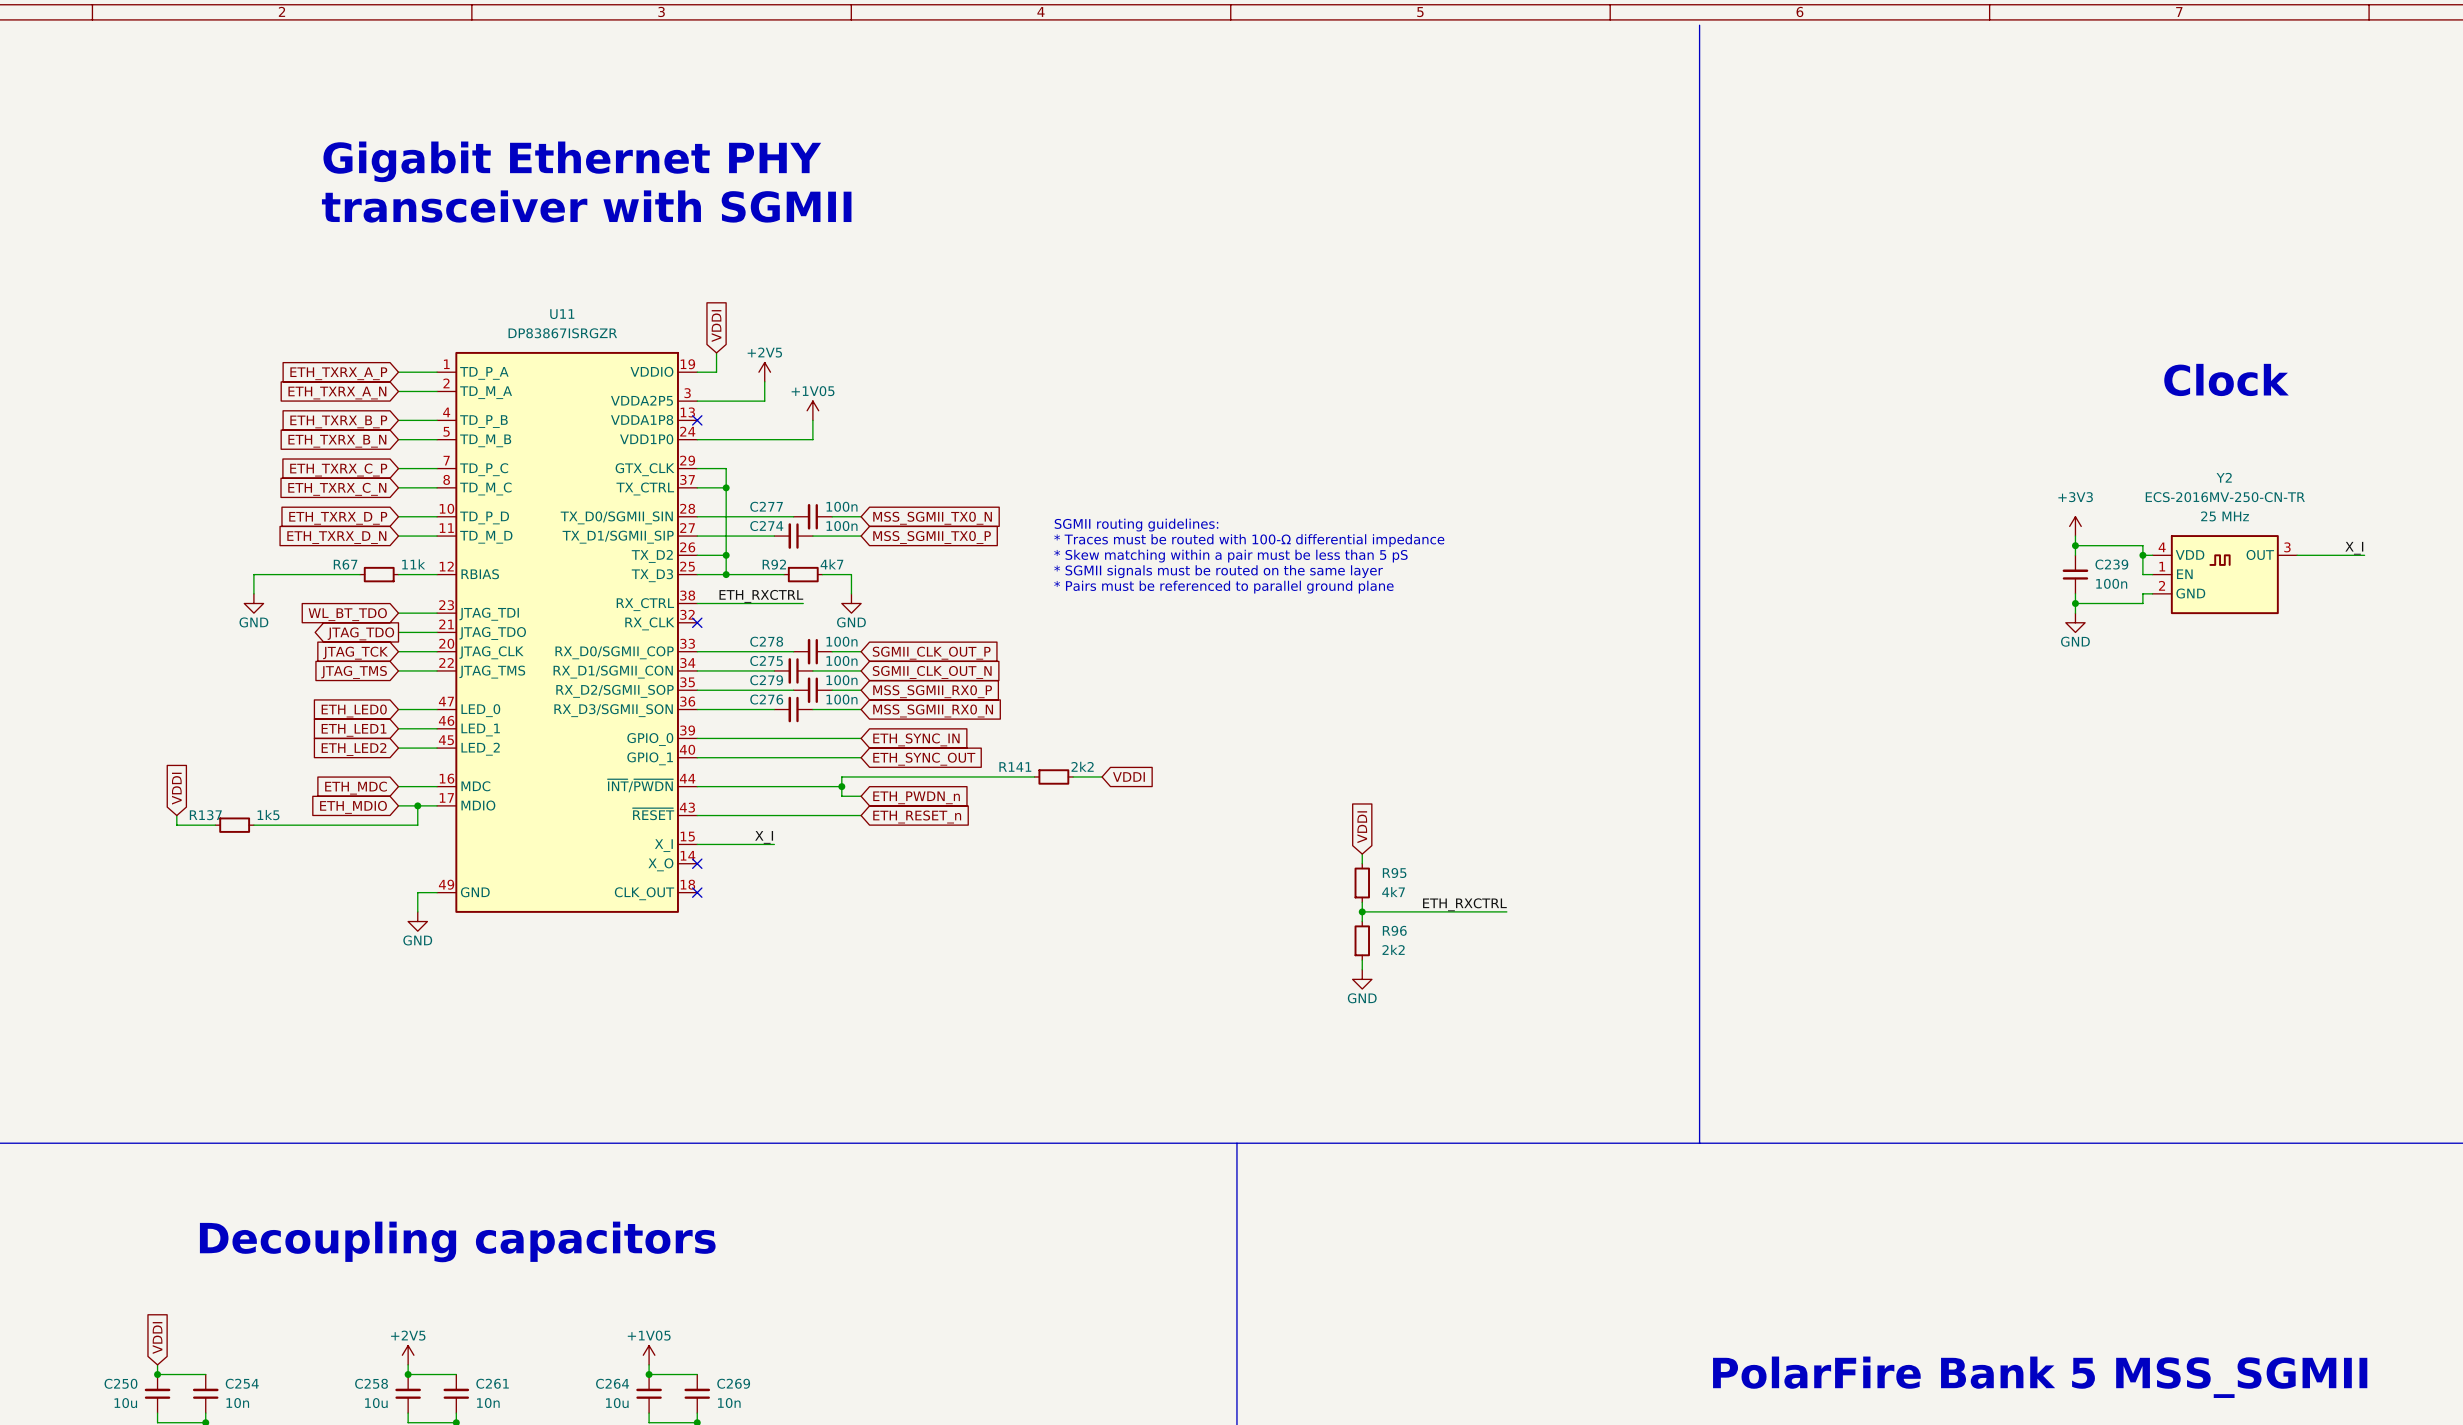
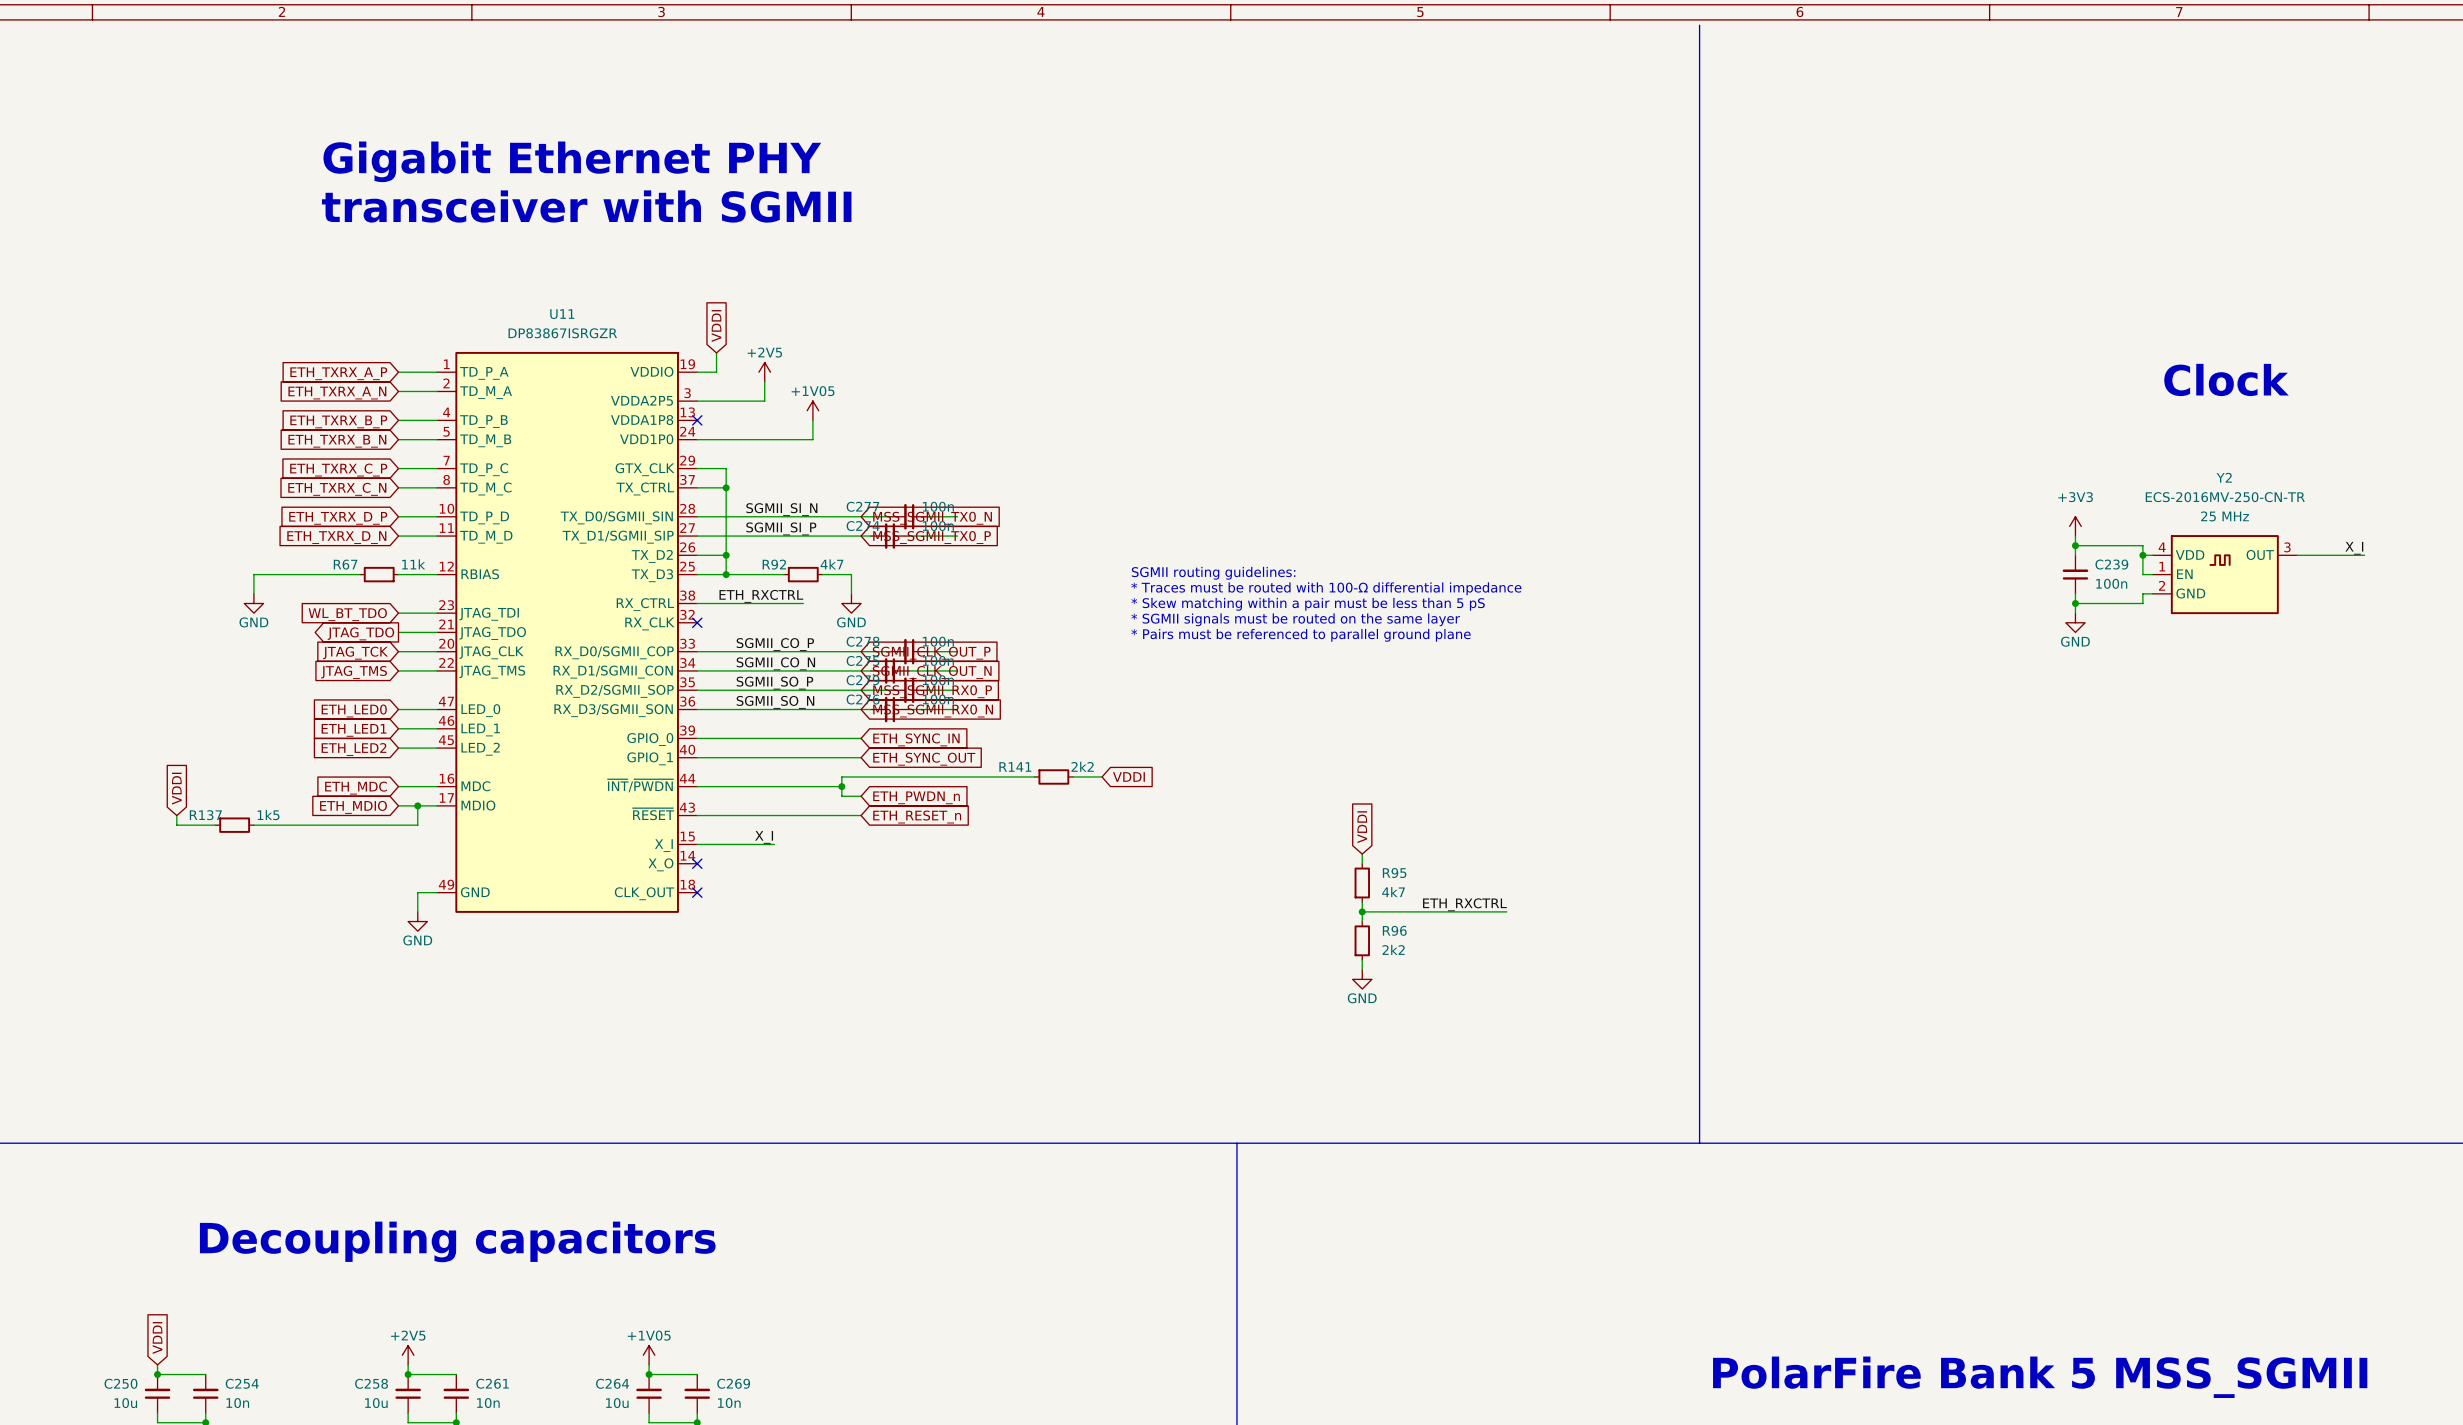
label: none -> SGMII_SI_N (781, 509)
C277 position: (812, 516) -> (909, 516)
wire: none -> (861, 516) (890, 516)
wire: none -> (928, 516) (957, 516)
text position: SGMII routing guidelines: (1136, 525) -> SGMII routing guidelines: (1213, 573)
label: none -> SGMII_SI_P (781, 528)
C274 position: (793, 536) -> (890, 536)
wire: none -> (861, 536) (870, 536)
wire: none -> (909, 536) (957, 536)
text position: * Traces must be routed with 100-Ω differential impedance (1249, 540) -> * Traces must be routed with 100-Ω differential impedance (1326, 588)
text position: * Skew matching within a pair must be less than 5 pS (1230, 556) -> * Skew matching within a pair must be less than 5 pS (1308, 604)
text position: * SGMII signals must be routed on the same layer (1218, 571) -> * SGMII signals must be routed on the same layer (1295, 619)
text position: * Pairs must be referenced to parallel ground plane (1223, 587) -> * Pairs must be referenced to parallel ground plane (1301, 635)
label: none -> SGMII_CO_P (775, 644)
C278 position: (812, 651) -> (909, 651)
wire: none -> (861, 651) (890, 651)
wire: none -> (928, 651) (957, 651)
label: none -> SGMII_CO_N (775, 663)
C275 position: (793, 670) -> (890, 670)
wire: none -> (861, 670) (870, 670)
wire: none -> (909, 670) (957, 670)
label: none -> SGMII_SO_P (774, 683)
C279 position: (812, 690) -> (909, 690)
wire: none -> (861, 690) (890, 690)
wire: none -> (928, 690) (957, 690)
label: none -> SGMII_SO_N (775, 702)
C276 position: (793, 709) -> (890, 709)
wire: none -> (861, 709) (870, 709)
wire: none -> (909, 709) (957, 709)

